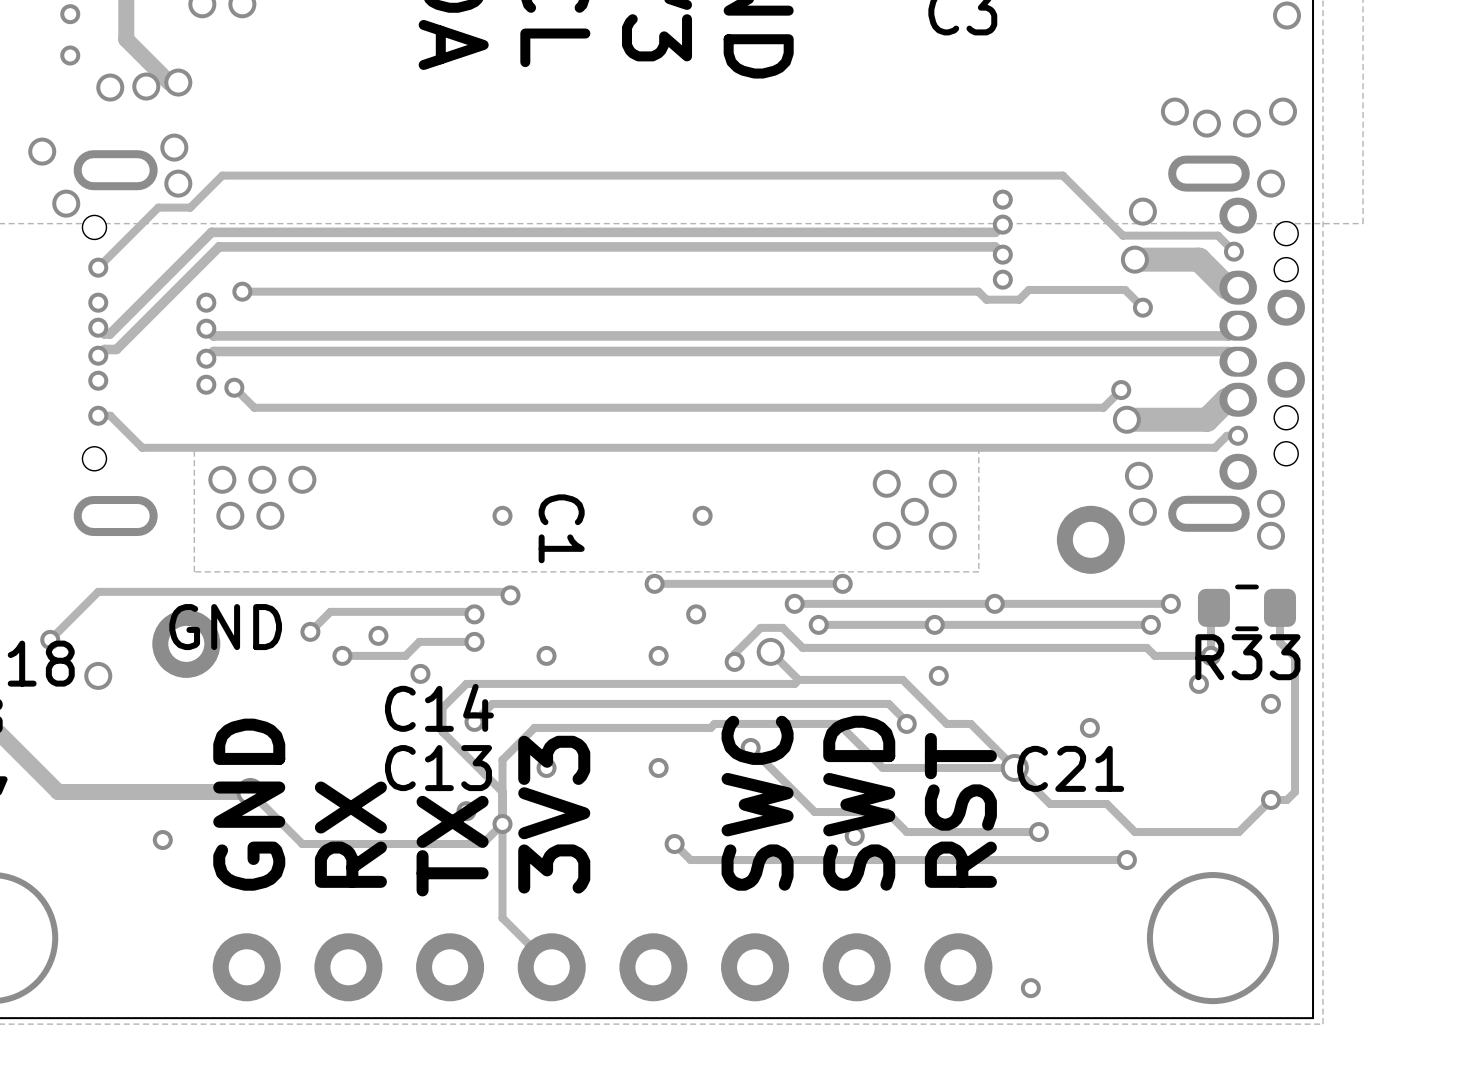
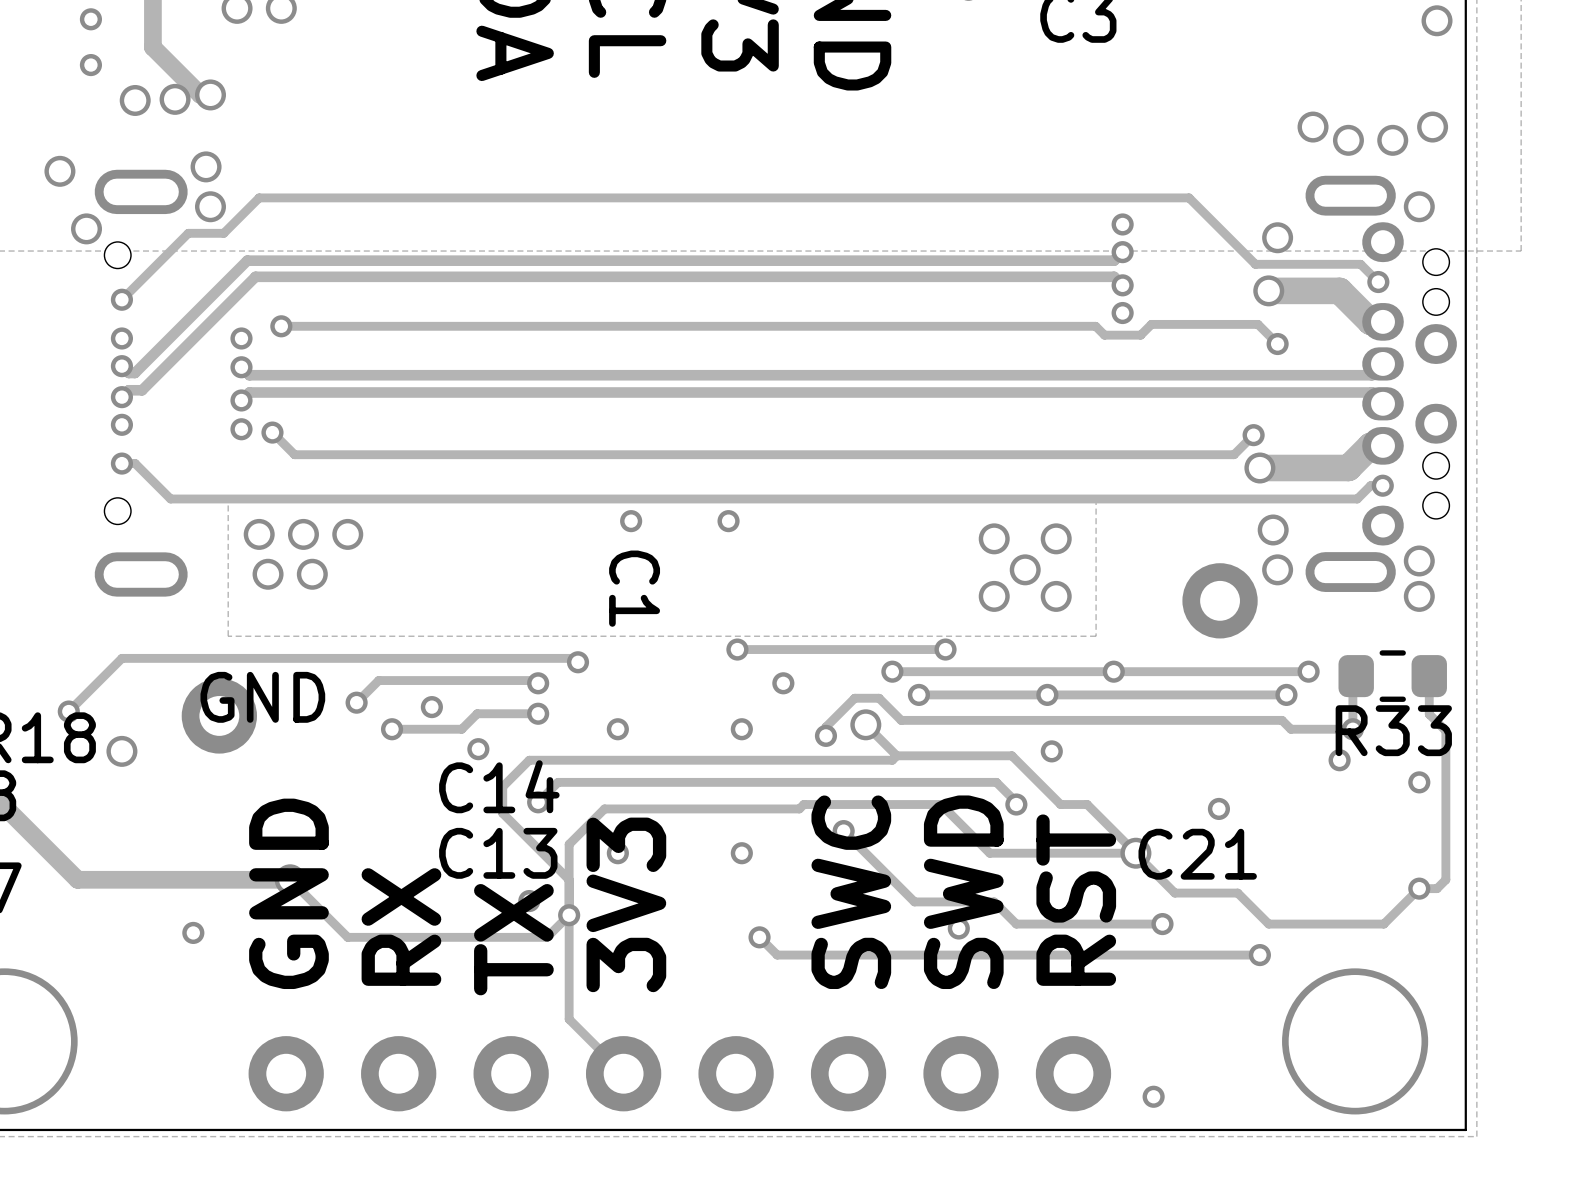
via position: (502, 515) -> (631, 521)
via position: (702, 515) -> (728, 521)

